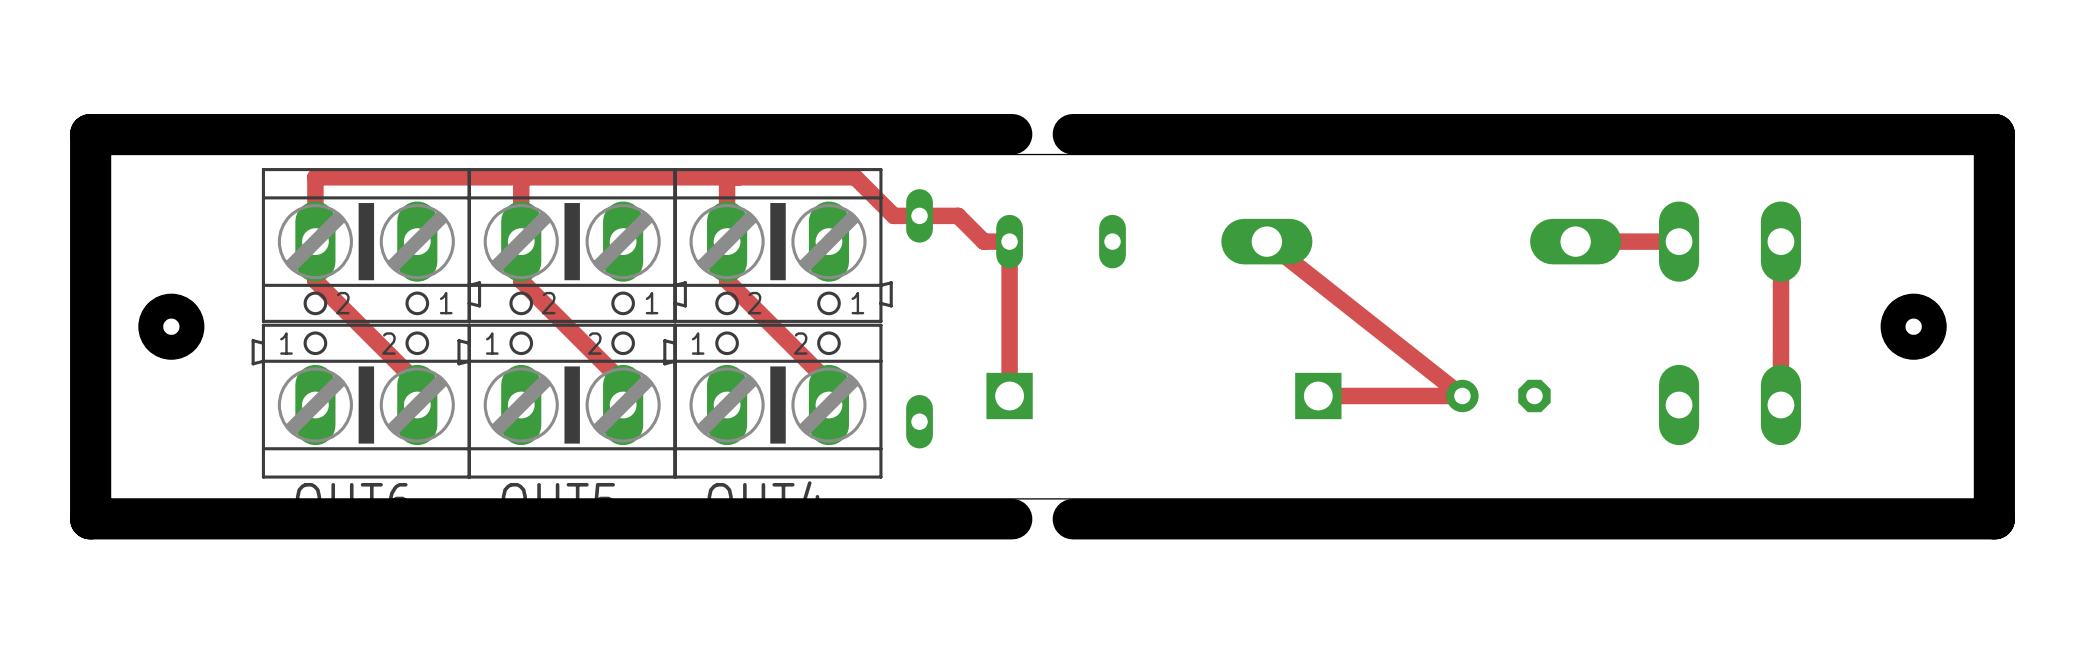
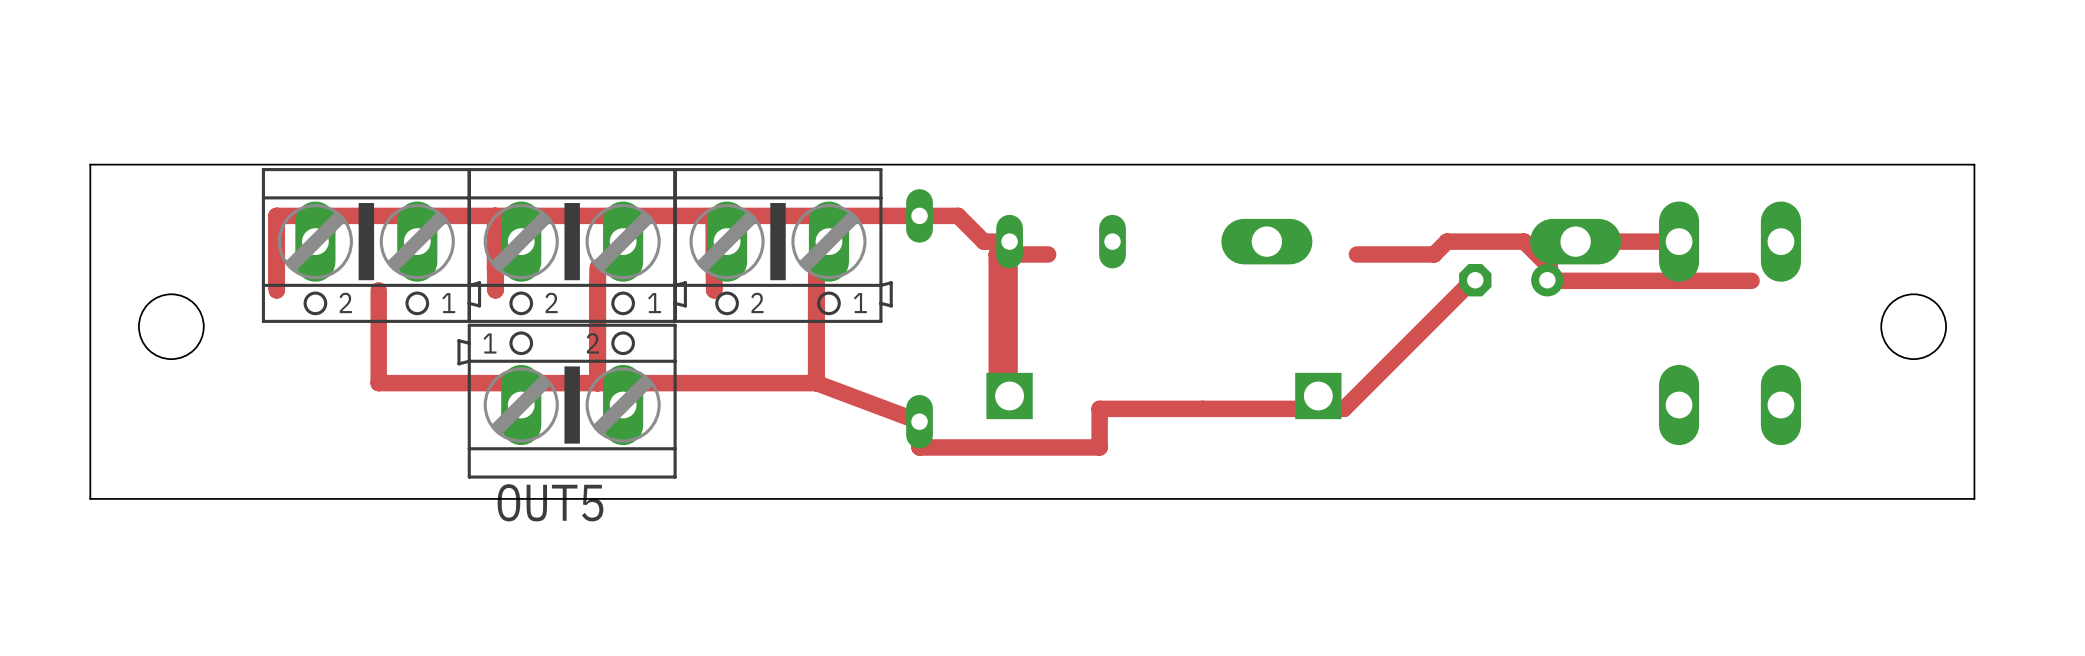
board edge: (1012, 134) (90, 134) (90, 164) -> none
board edge: (1072, 134) (1994, 134) (1994, 519) (1072, 519) -> none
board edge width: thick (90, 164) (90, 498) -> thin (90, 164) (90, 498)
board edge: (1974, 164) (1974, 154) (110, 154) (110, 498) -> (1974, 164) (90, 164)
top track: (521, 177) (521, 280) (623, 382) (623, 405) -> none
top track: (727, 177) (727, 280) (828, 382) (828, 405) -> none
top track: (893, 215) (855, 177) (315, 177) (315, 280) (417, 382) (417, 405) -> (893, 215) (714, 215) (714, 290) (713, 215) (495, 215) (495, 290) (495, 215) (276, 215) (276, 290) (276, 215)
top track: (1266, 241) (1462, 395) (1318, 395) -> none
top track: (1781, 241) (1780, 405) -> none
top track: none -> (1048, 254) (996, 254) (996, 408)
top track: none -> (1356, 254) (1434, 254) (1446, 241) (1524, 241) (1549, 267) (1549, 277) (1547, 280)
top track: none -> (1475, 280) (1472, 280) (1344, 408) (1099, 408) (1099, 447) (919, 447) (919, 421) (816, 383)
top track: none -> (1547, 280) (1751, 280)
top track: none -> (378, 290) (378, 383) (816, 383)
round board edge: [138, 294, 204, 360] -> none
round board edge: [1881, 294, 1947, 360] -> none
top track: none -> (597, 383) (597, 267) (597, 383)
top track: none -> (816, 383) (816, 267) (816, 383)
part rotation: 0° (1498, 395) -> 180° (1511, 280)
part position: (1498, 395) -> (1511, 280)
part: (361, 401) -> none
part: (772, 401) -> none
board edge: (90, 498) (90, 519) (1012, 519) -> (90, 498) (110, 498)

